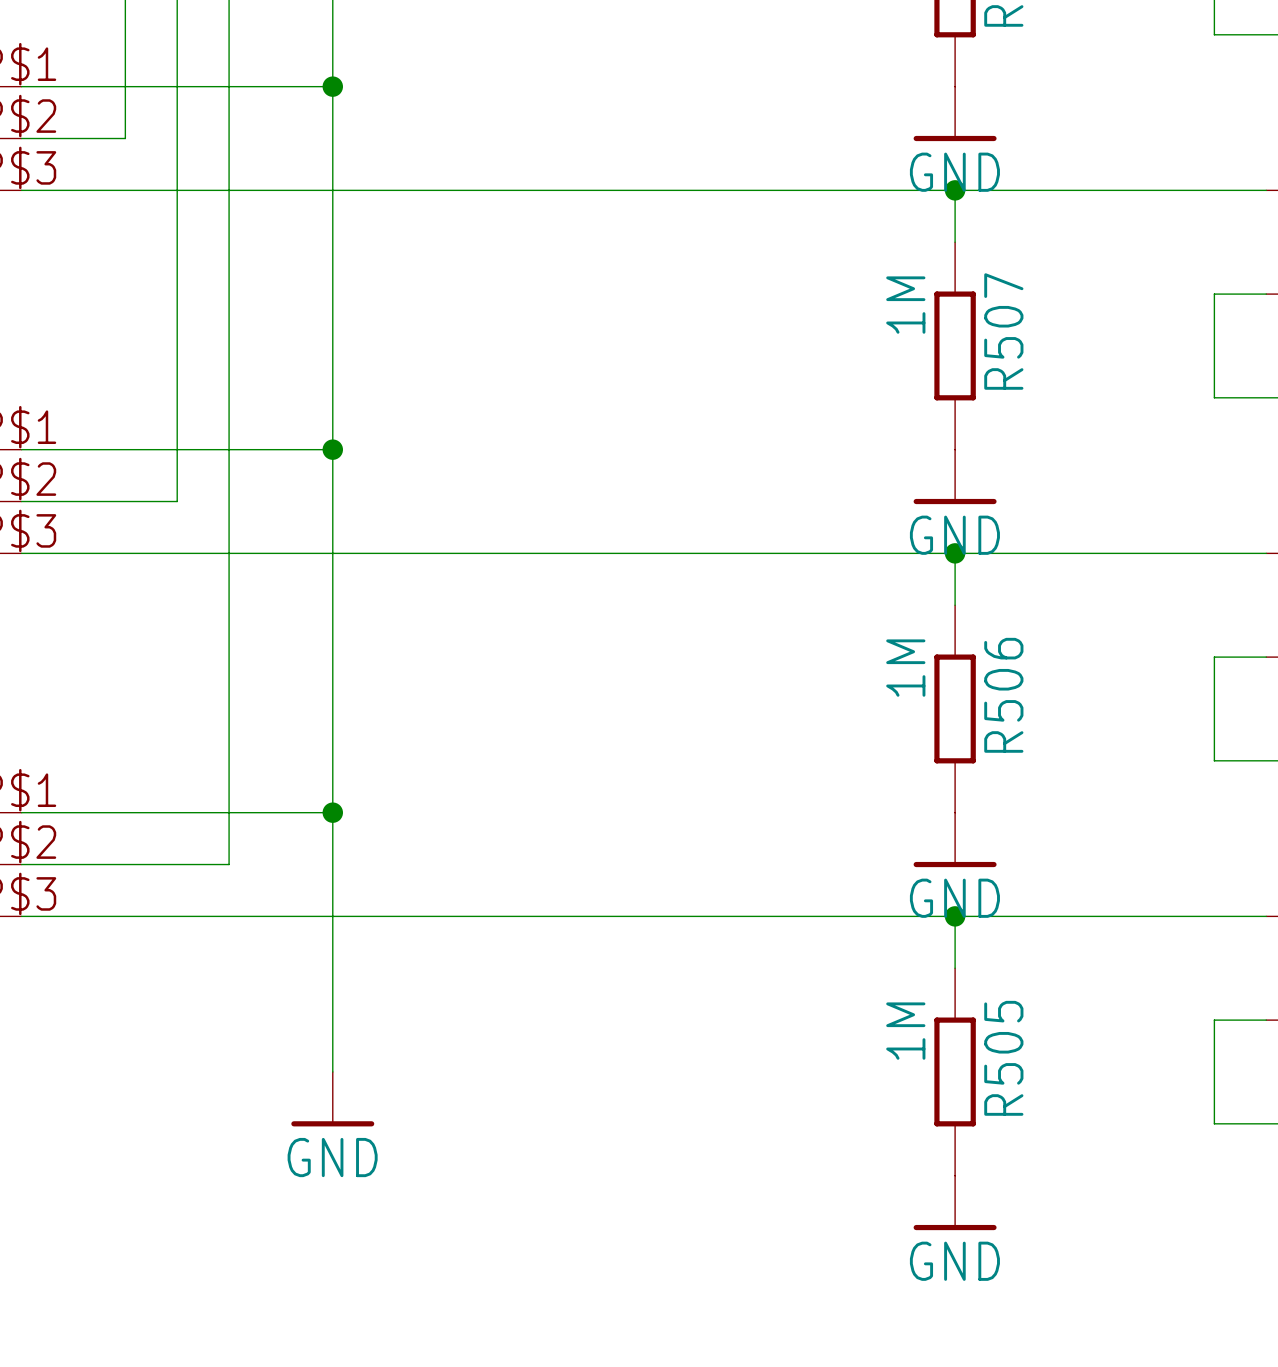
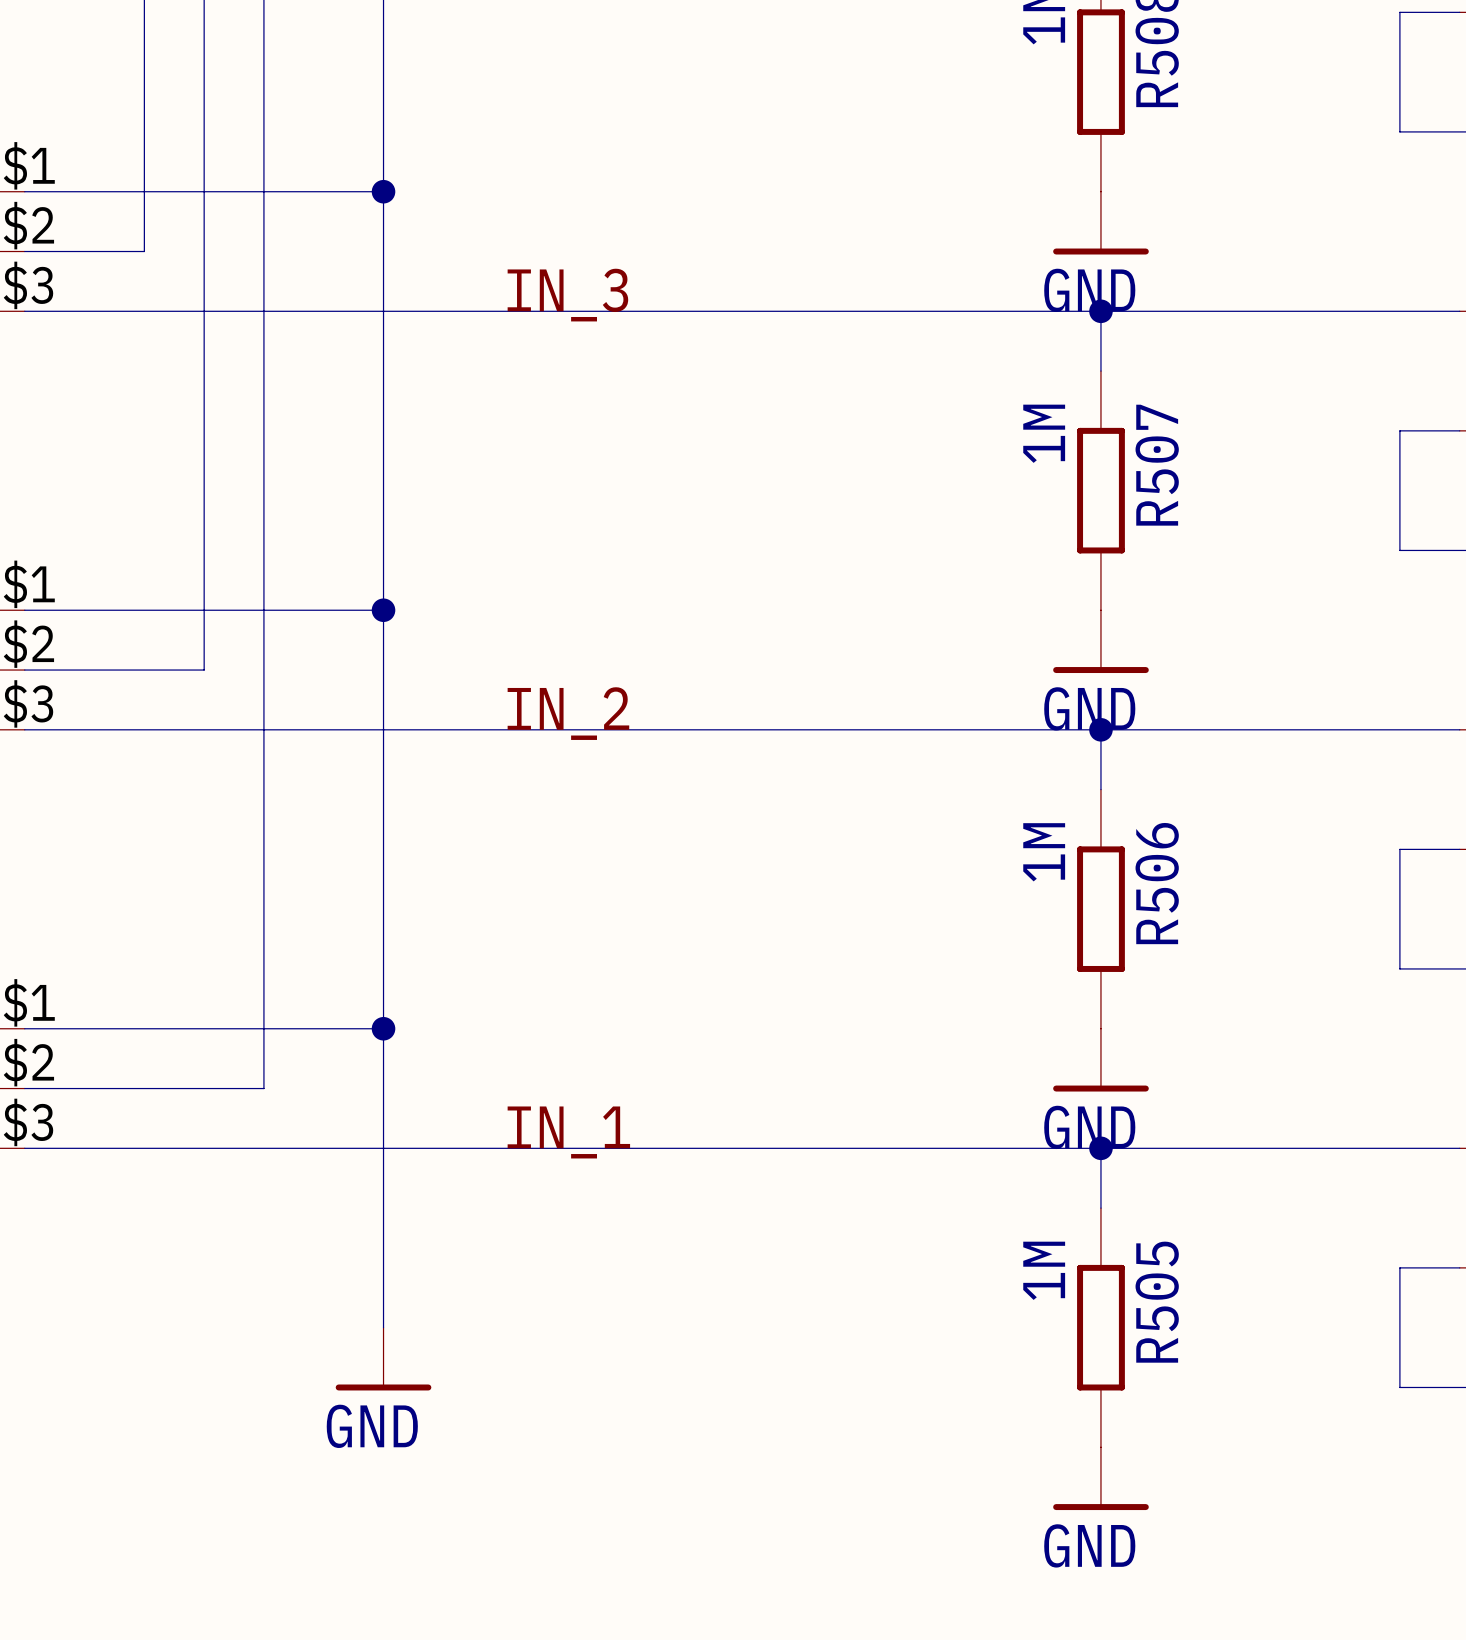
label: none -> IN_3 (567, 295)
label: none -> IN_2 (568, 713)
label: none -> IN_1 (568, 1132)

